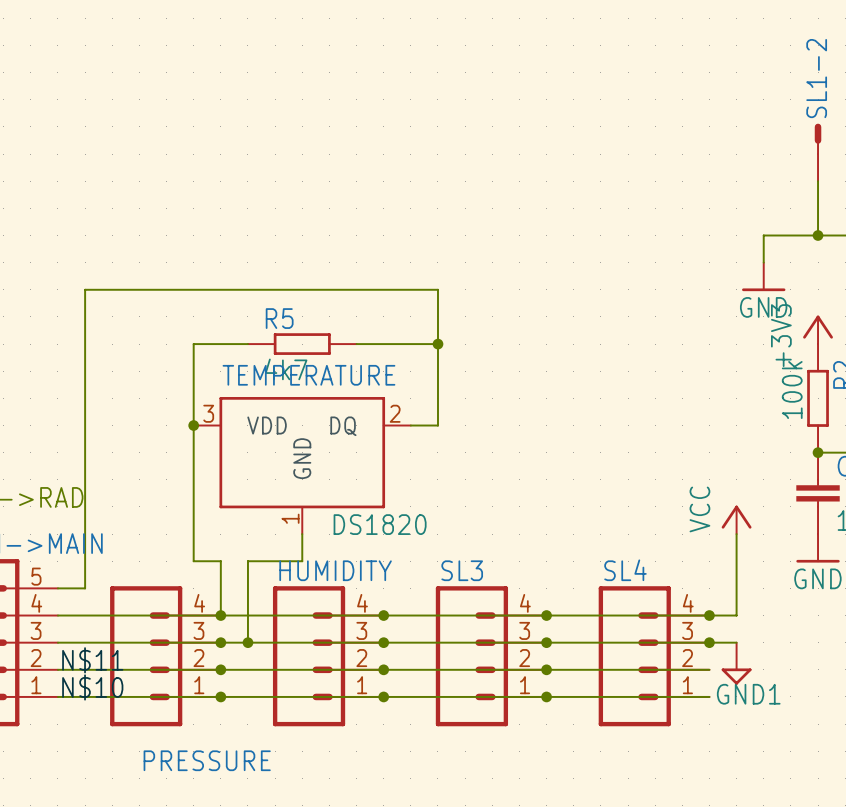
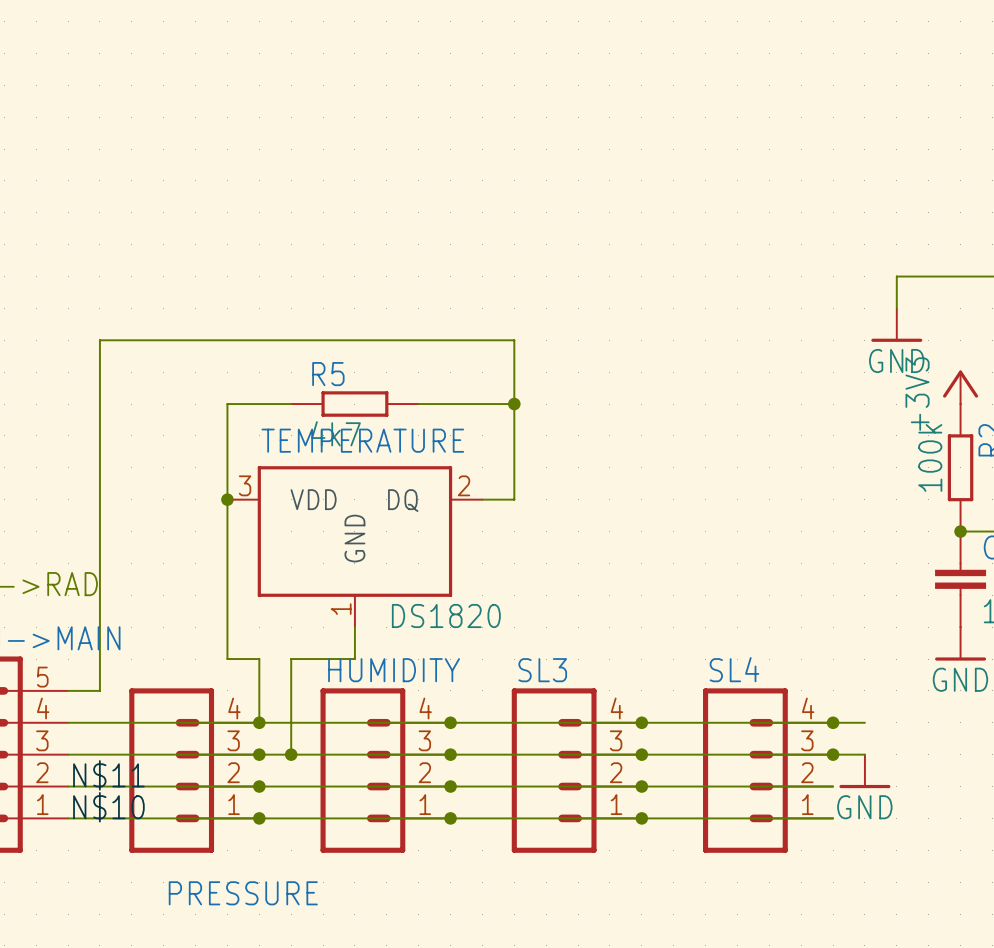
SL1-2: (818, 152) -> none
wire: (818, 181) (818, 235) -> none
junction: (818, 235) -> none
power symbol: VCC (736, 519) -> none
wire: (736, 534) (736, 615) -> none
power symbol: GND1 (736, 663) -> GND (864, 771)

